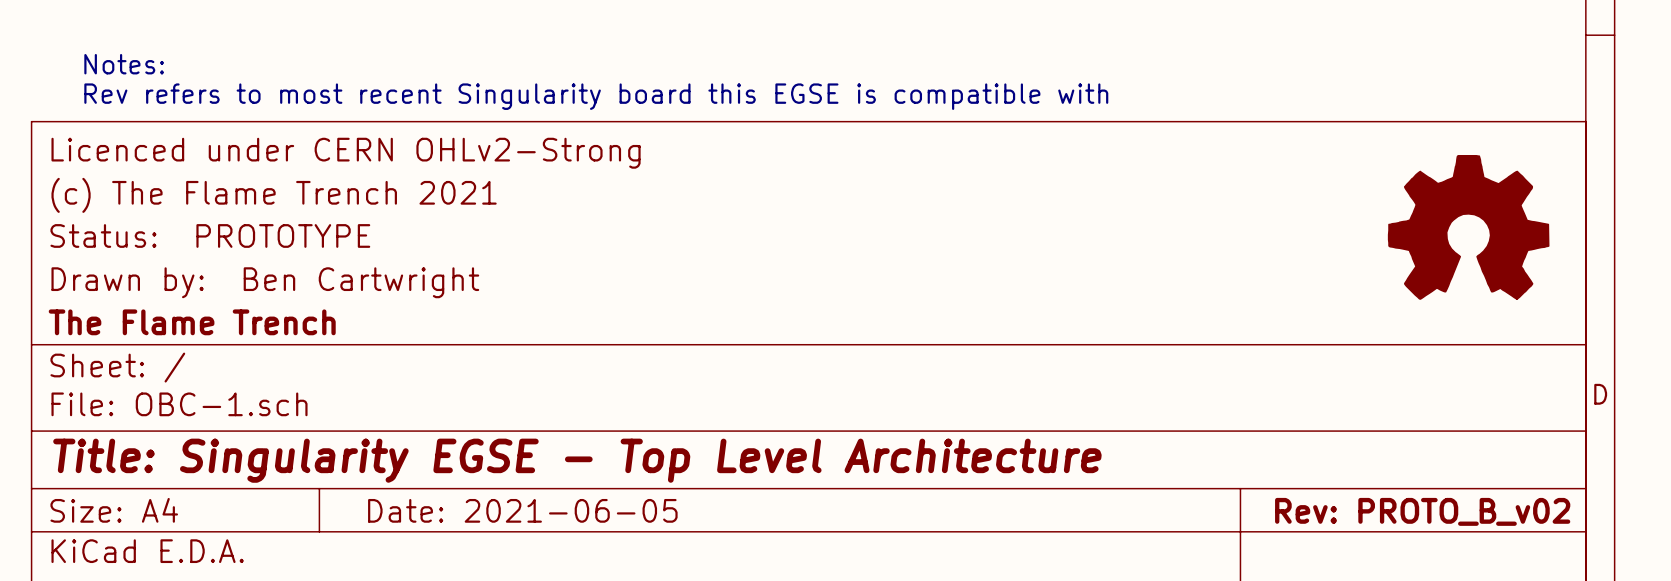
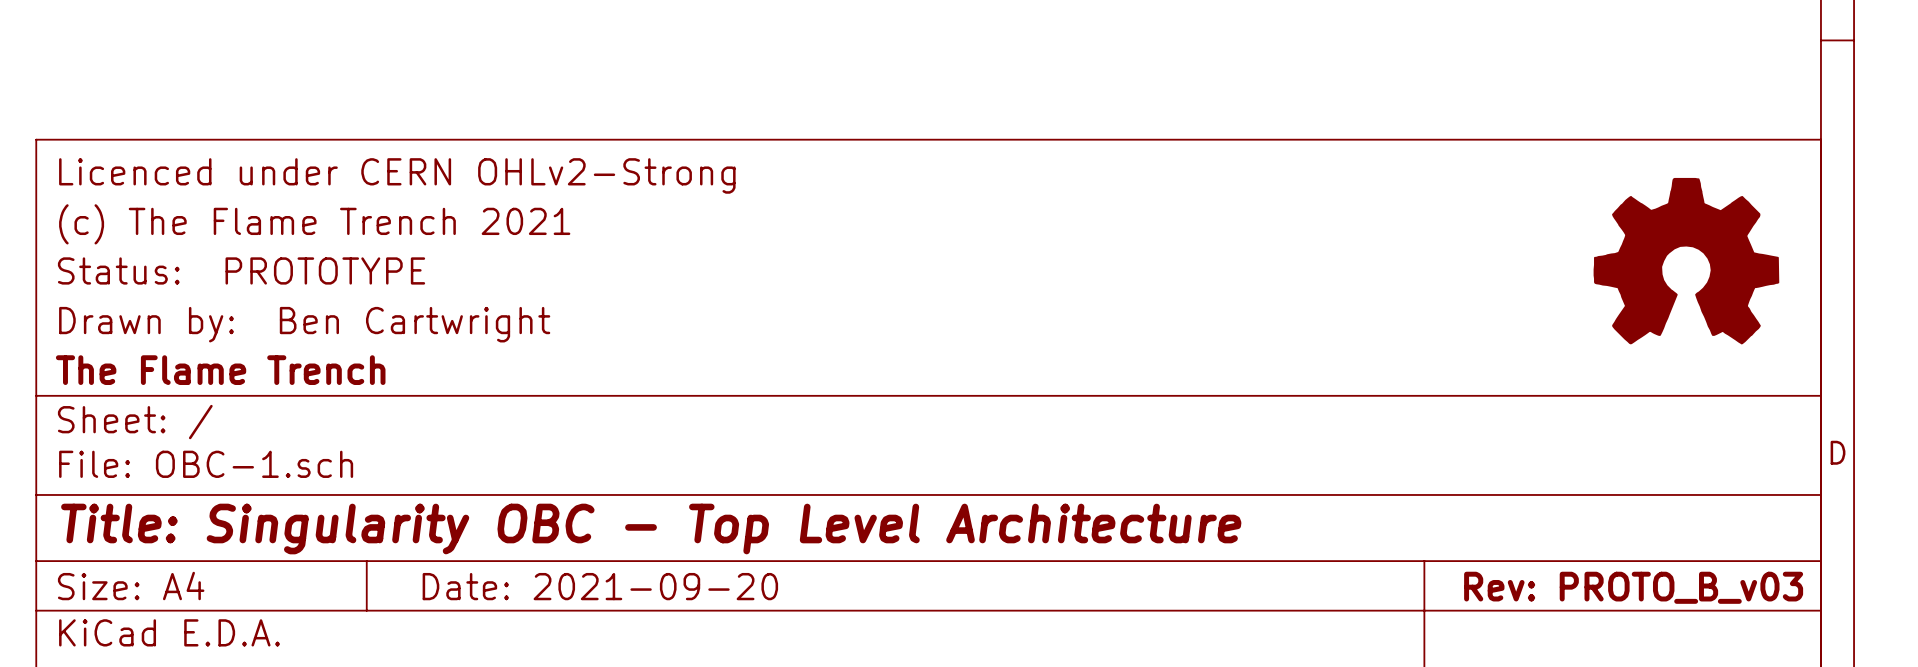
text: Notes: (124, 64) -> none
text: Rev refers to most recent Singularity board this EGSE is compatible with (596, 96) -> none
title block: Title: Singularity EGSE - Top Level Architecture (577, 460) -> Title: Singularity OBC - Top Level Architecture (651, 529)
title block: Date: 2021-06-05 (522, 510) -> Date: 2021-09-20 (600, 586)
title block: Rev: PROTO_B_v02 (1422, 511) -> Rev: PROTO_B_v03 (1633, 587)

